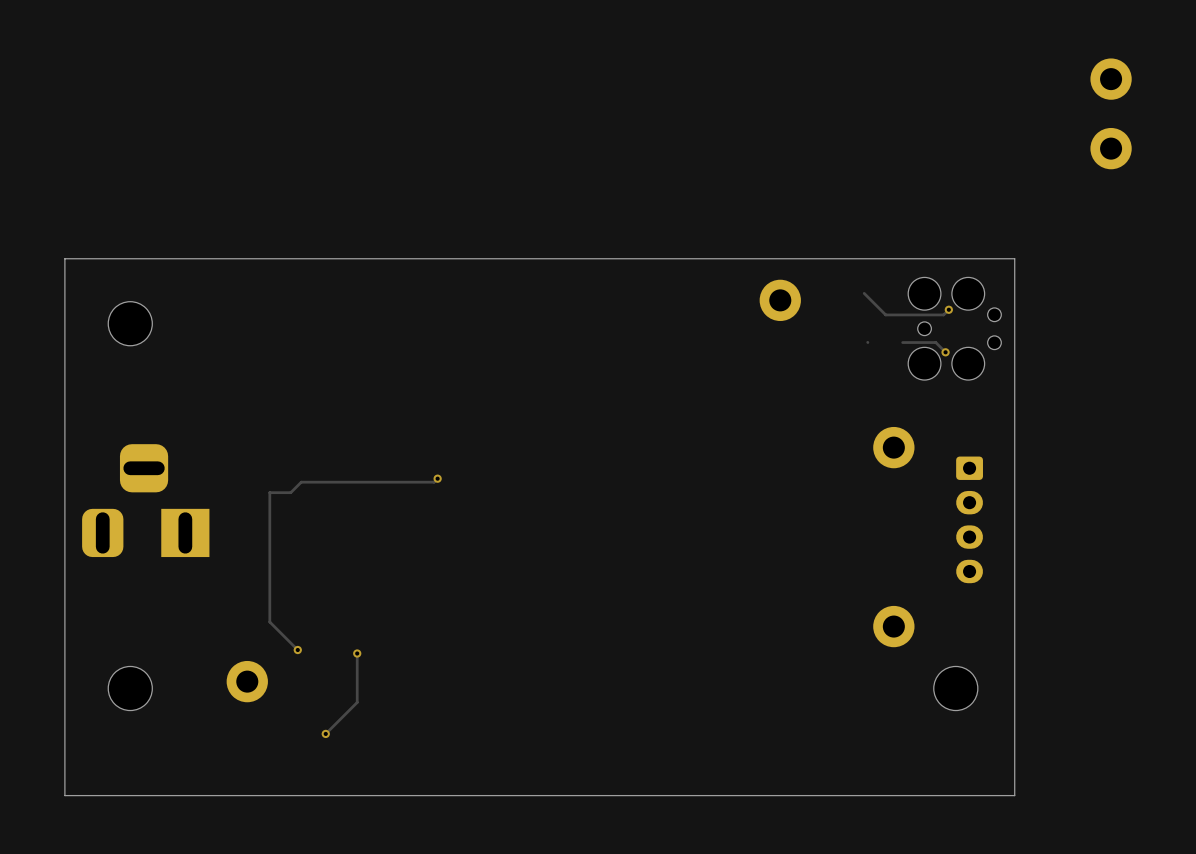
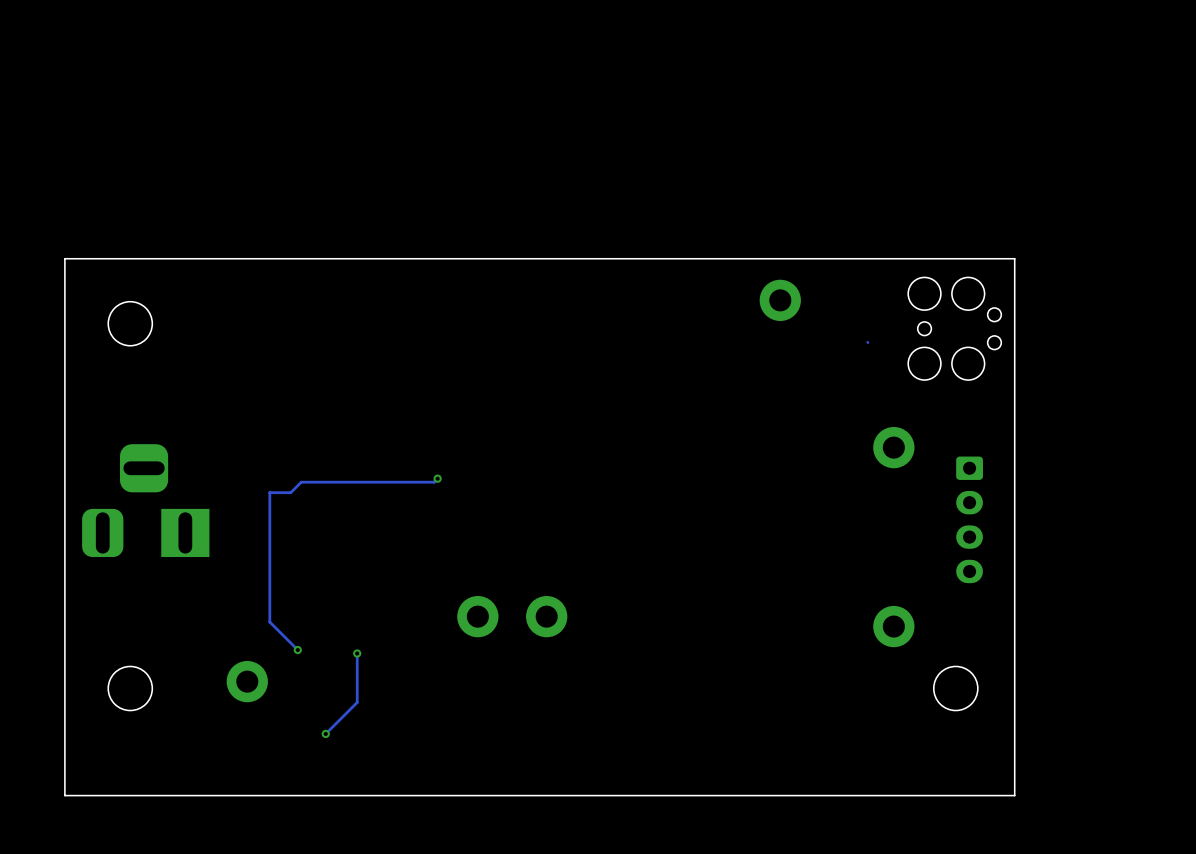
part: (1111, 79) -> none
part: (1111, 148) -> none
track: (864, 293) (885, 314) (943, 314) (948, 309) -> none
via: (948, 309) -> none
track: (902, 342) (935, 342) (945, 352) -> none
via: (945, 352) -> none
part: none -> (477, 616)
part: none -> (546, 616)

